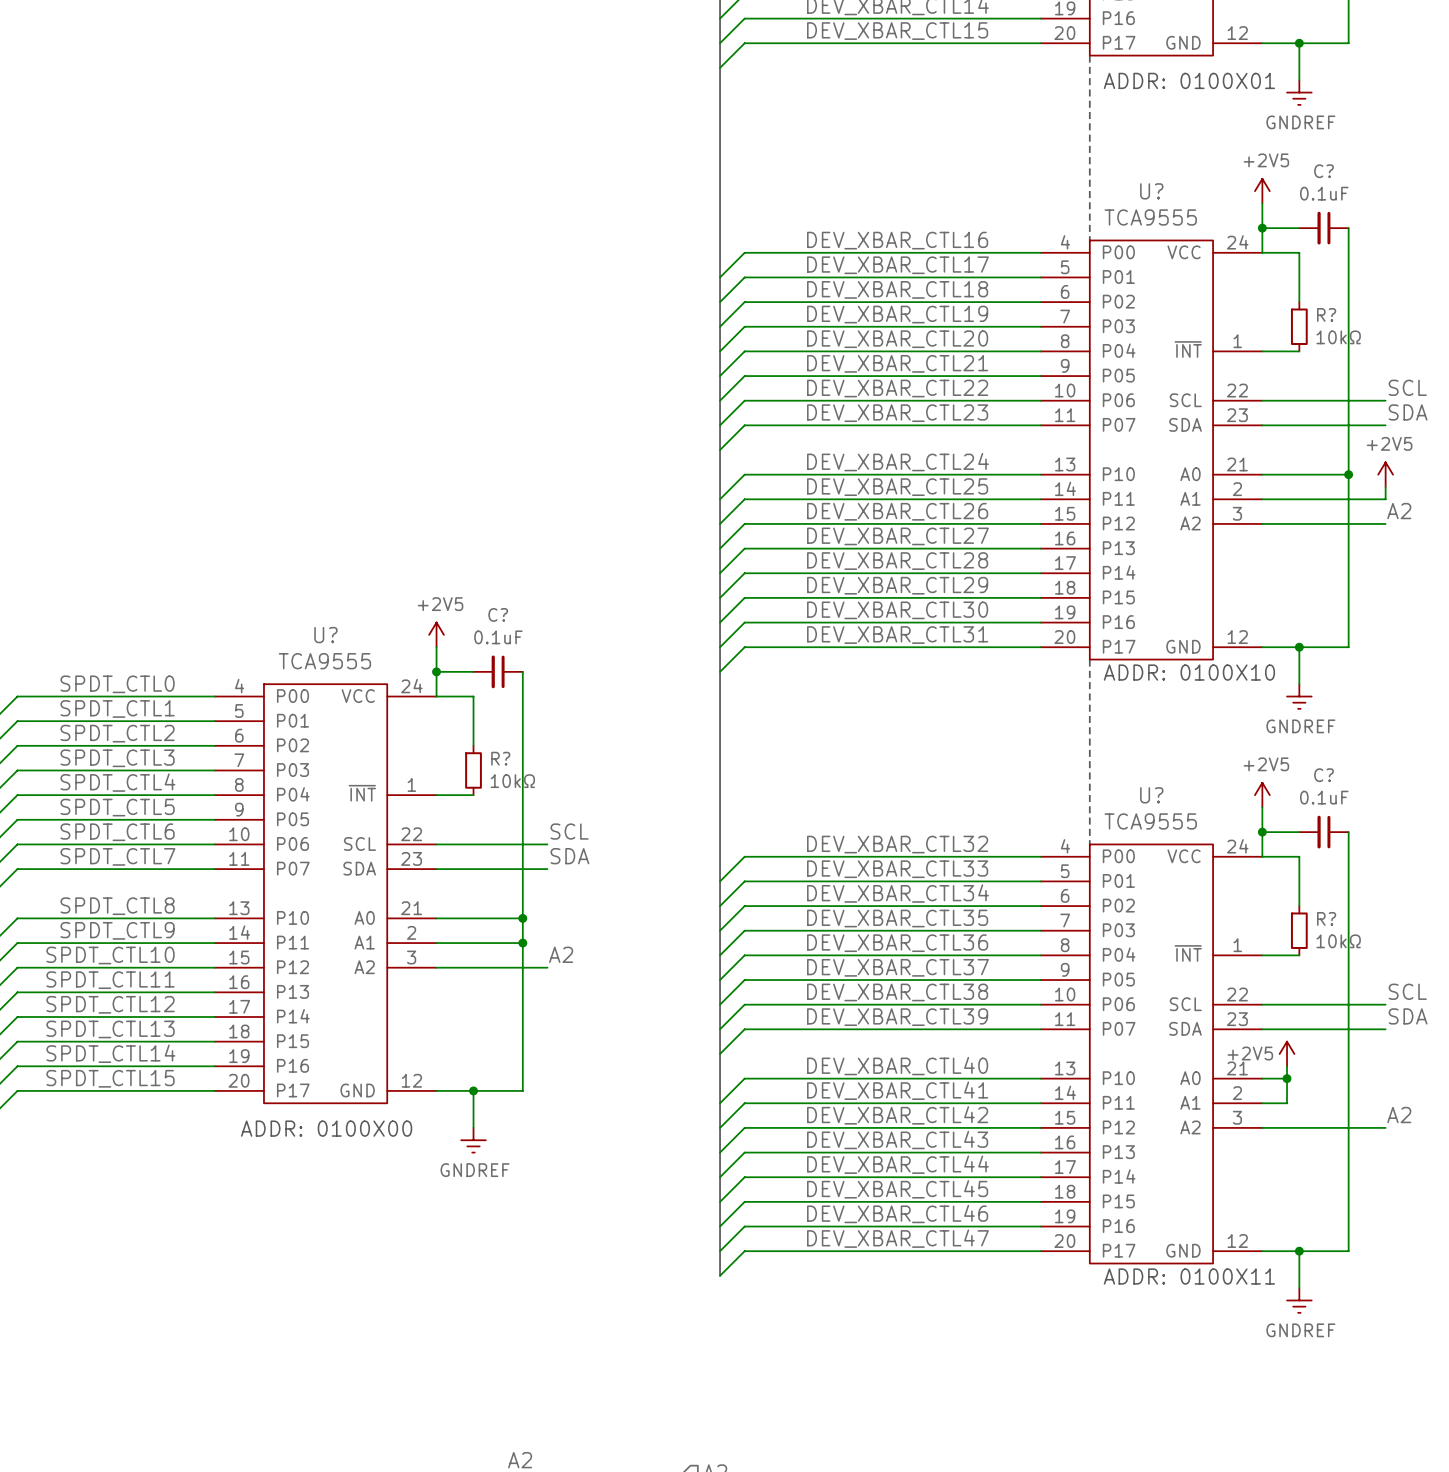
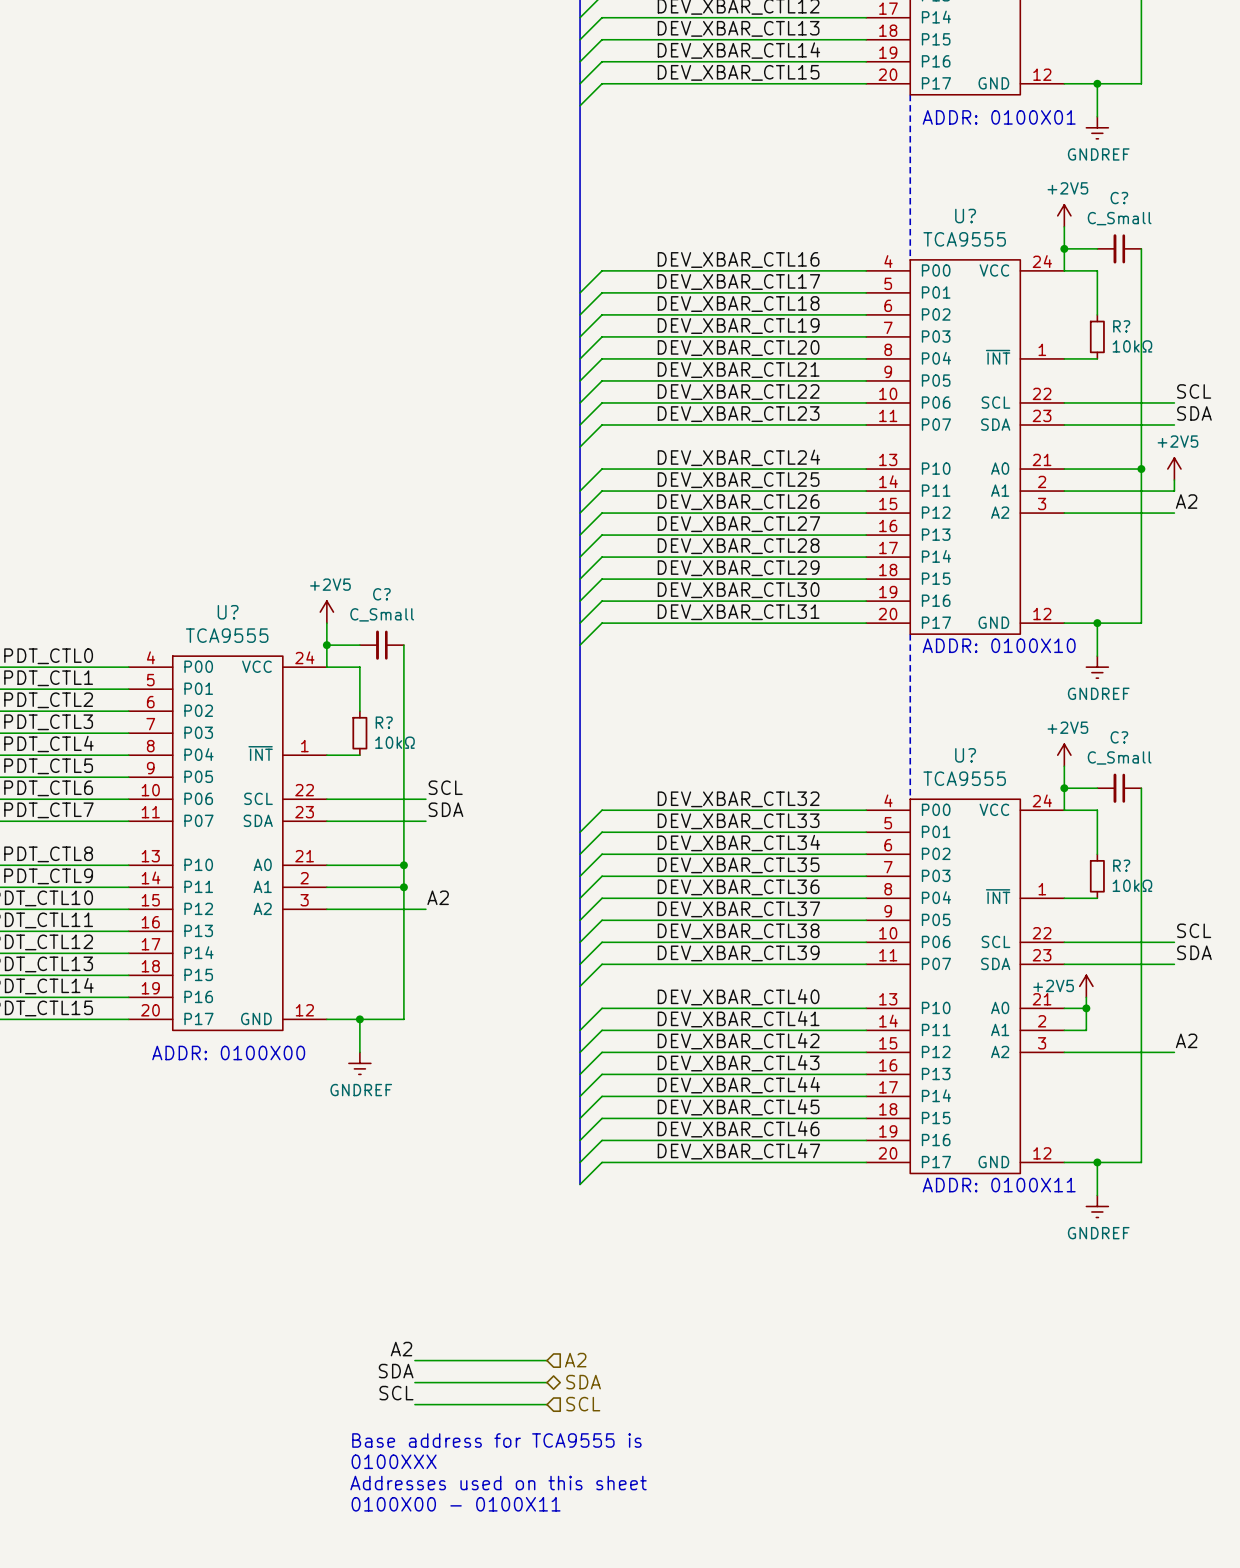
C? value: 0.1uF (1324, 193) -> C_Small (1119, 218)
C? value: 0.1uF (498, 637) -> C_Small (382, 614)
C? value: 0.1uF (1324, 797) -> C_Small (1119, 757)

